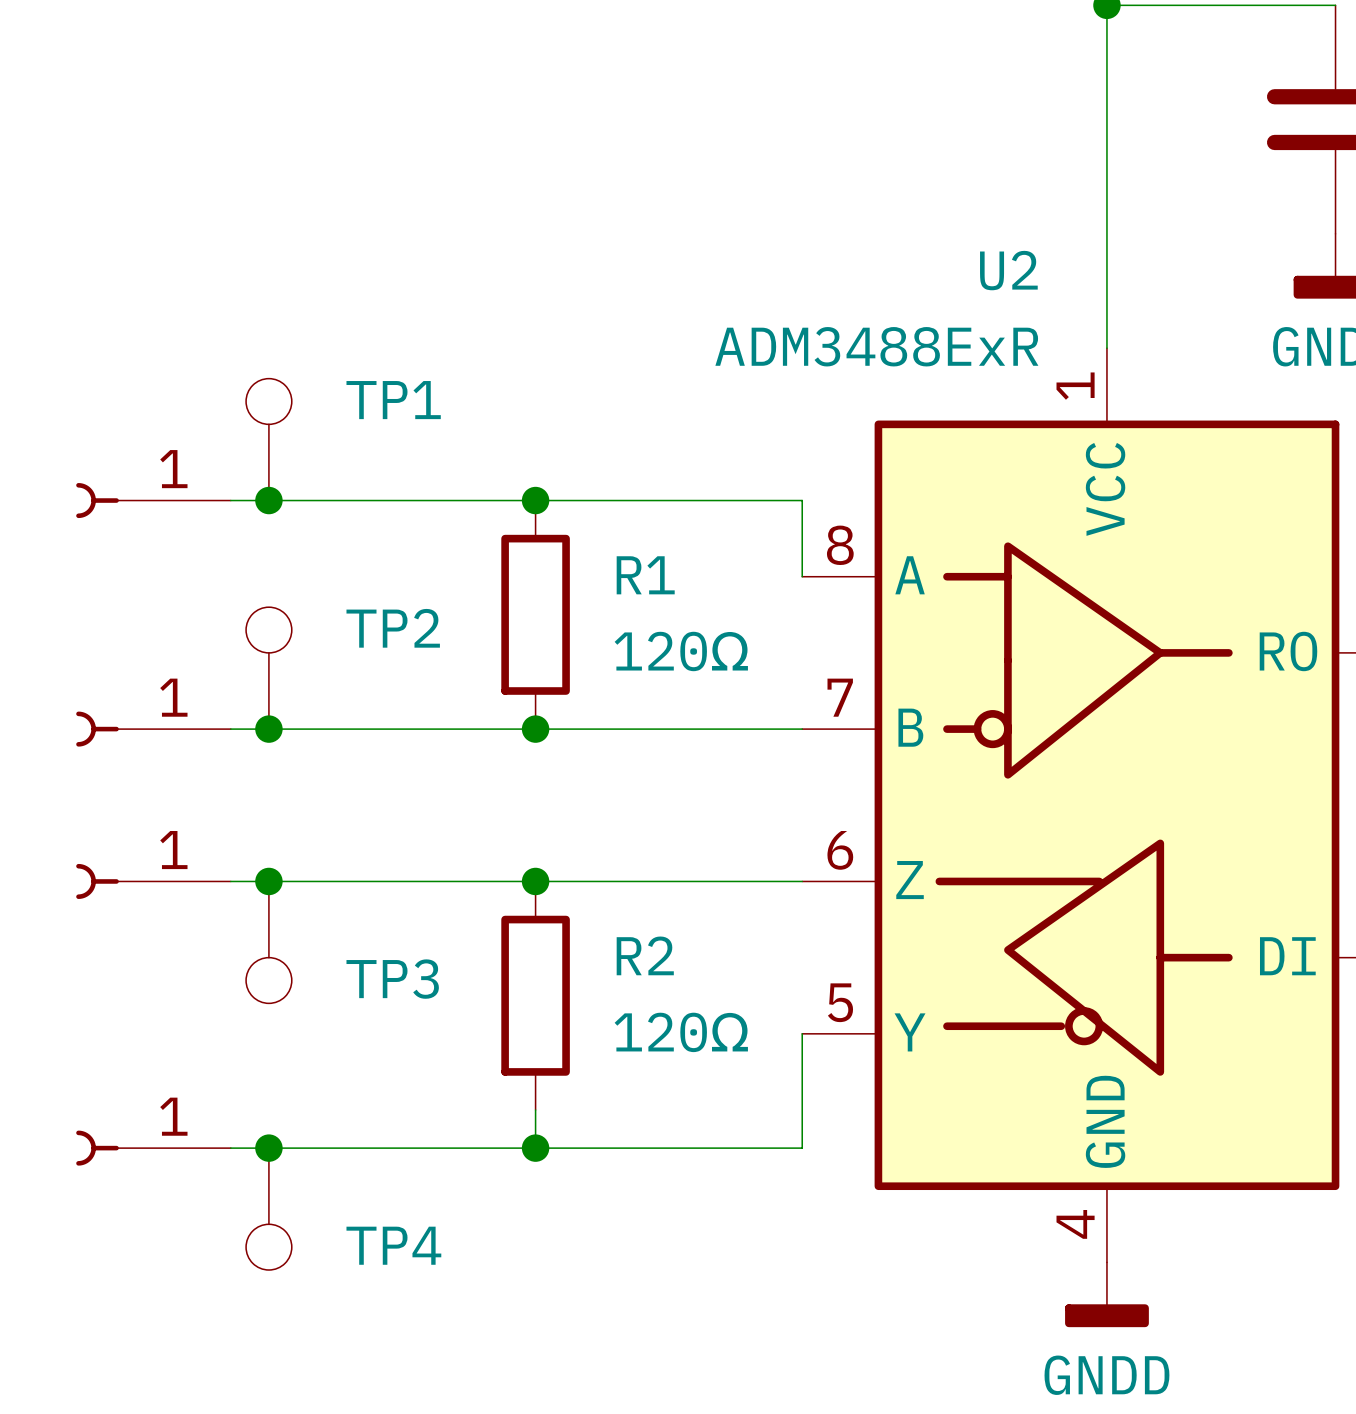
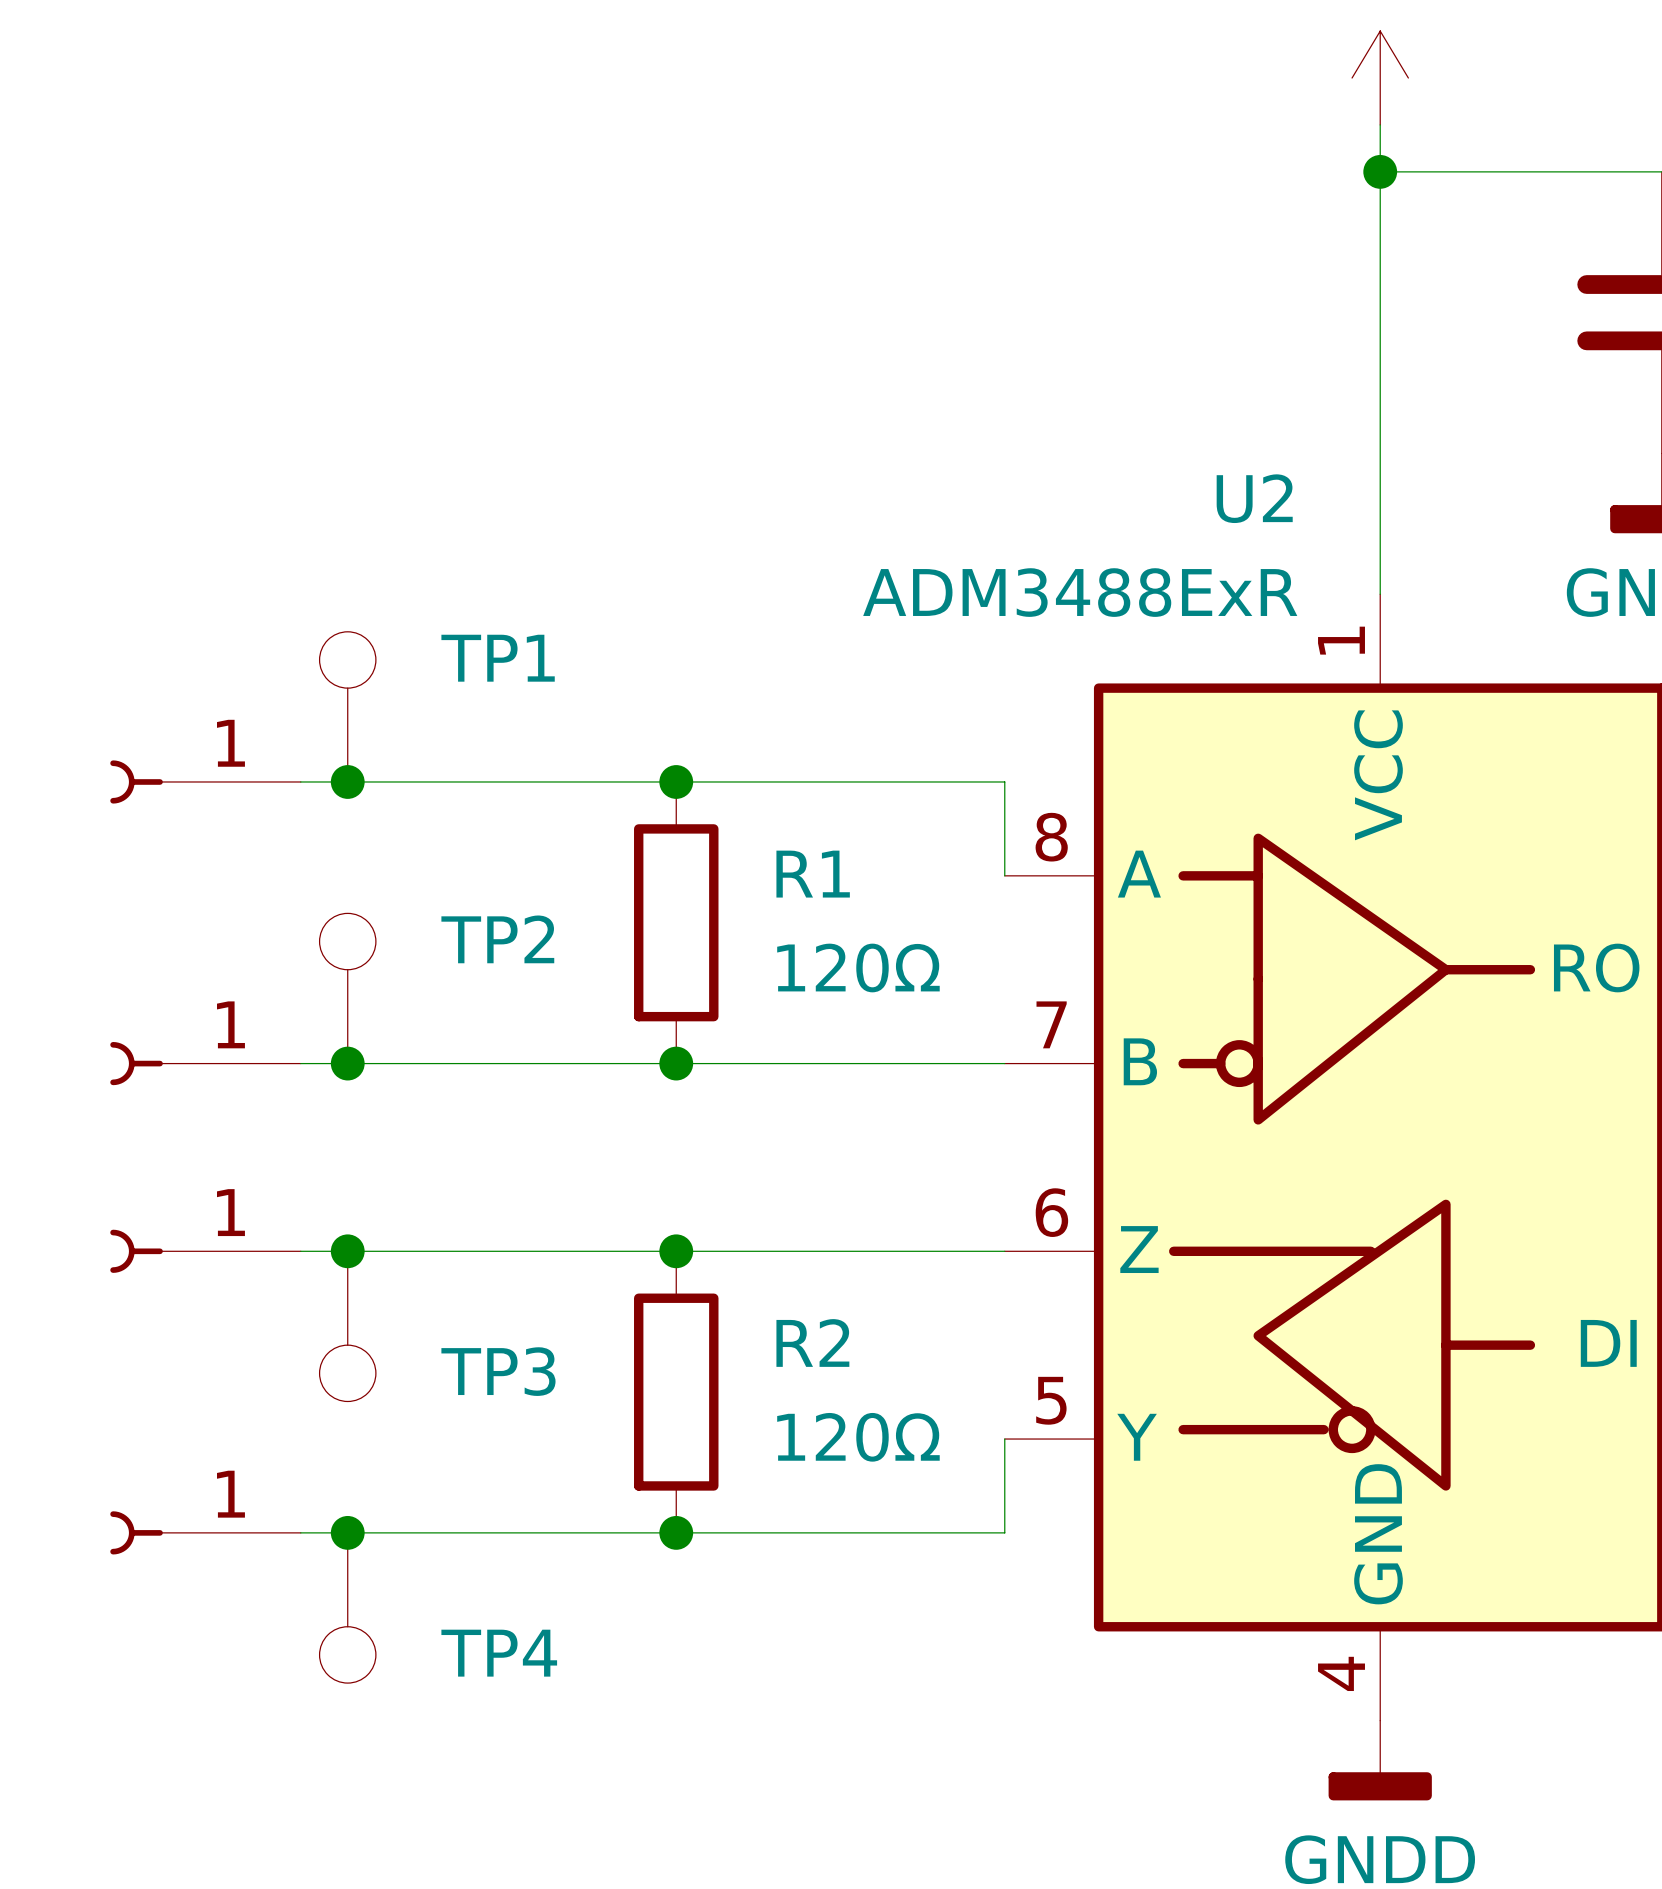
wire: (535, 1110) (535, 1148) -> none
wire: (802, 1110) (802, 1148) (230, 1148) -> (1004, 1532) (300, 1532)
part position: (153, 1148) -> (205, 1532)
junction position: (268, 1148) -> (347, 1532)
junction position: (535, 1148) -> (676, 1532)
TP4 position: (268, 1209) -> (347, 1607)

